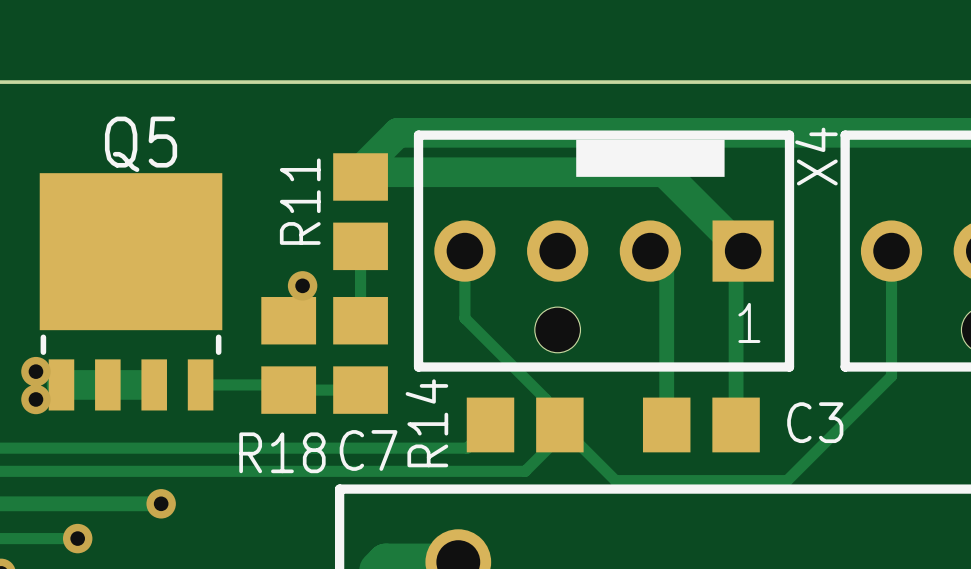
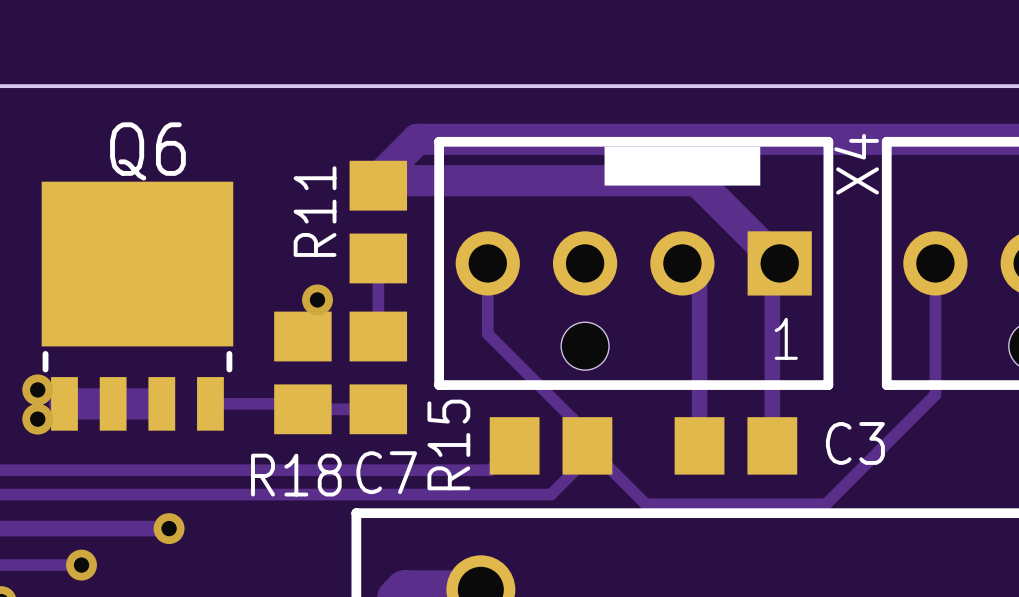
Q5 name: Q5 (141, 144) -> Q6 (147, 151)
R14 name: R14 (426, 423) -> R15 (448, 444)

